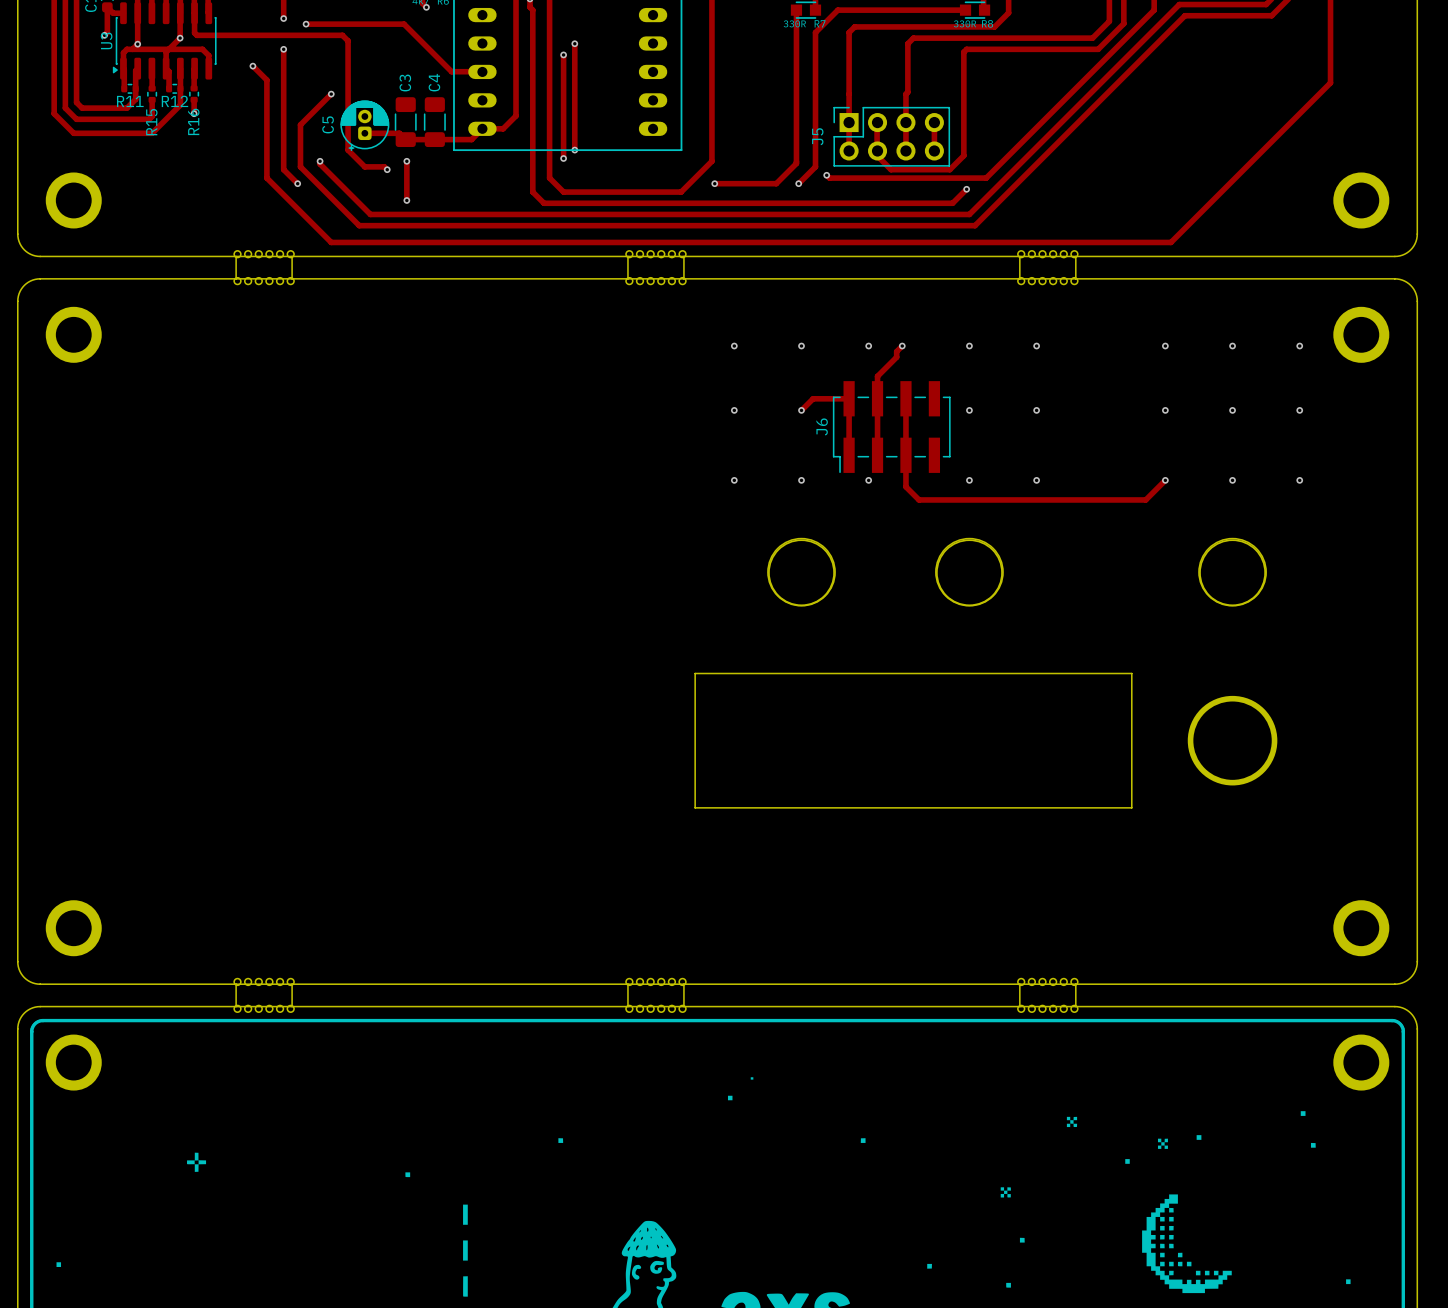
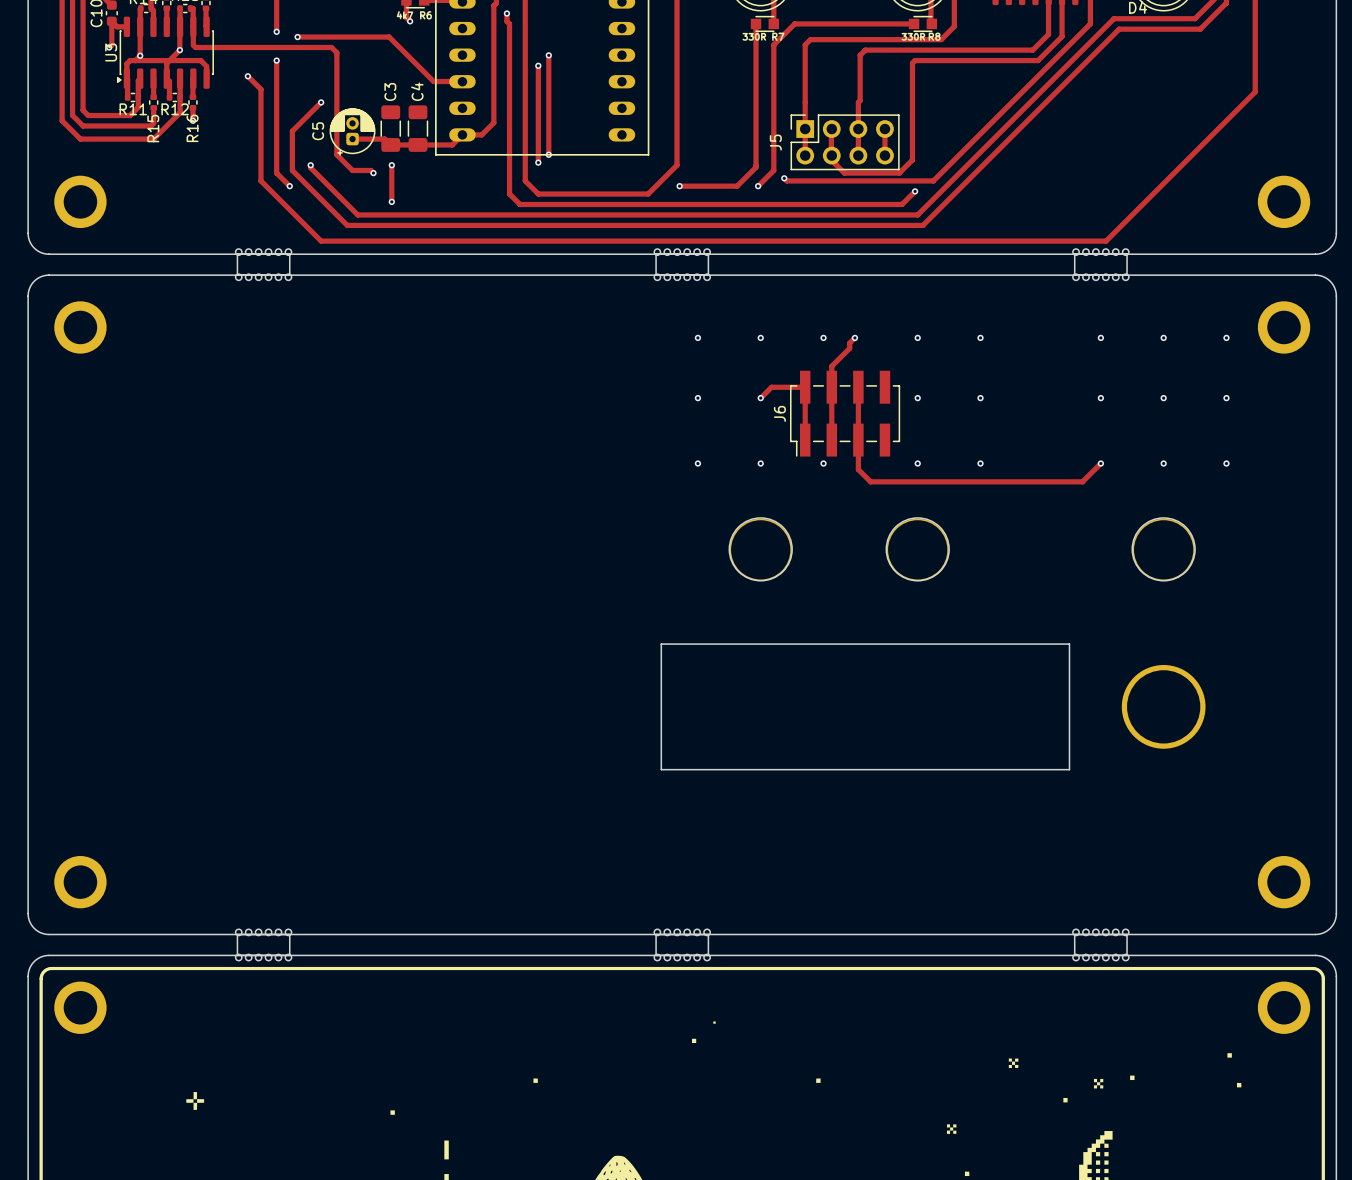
part footprint: [234, 250, 295, 285] -> [235, 248, 292, 281]
part: (655, 267) -> none
part: none -> (682, 264)
part: (1047, 267) -> none
part: none -> (1100, 264)
part footprint: [234, 978, 295, 1013] -> [235, 929, 292, 961]
part: (655, 995) -> none
part: none -> (682, 944)
part: (1047, 995) -> none
part: none -> (1100, 944)

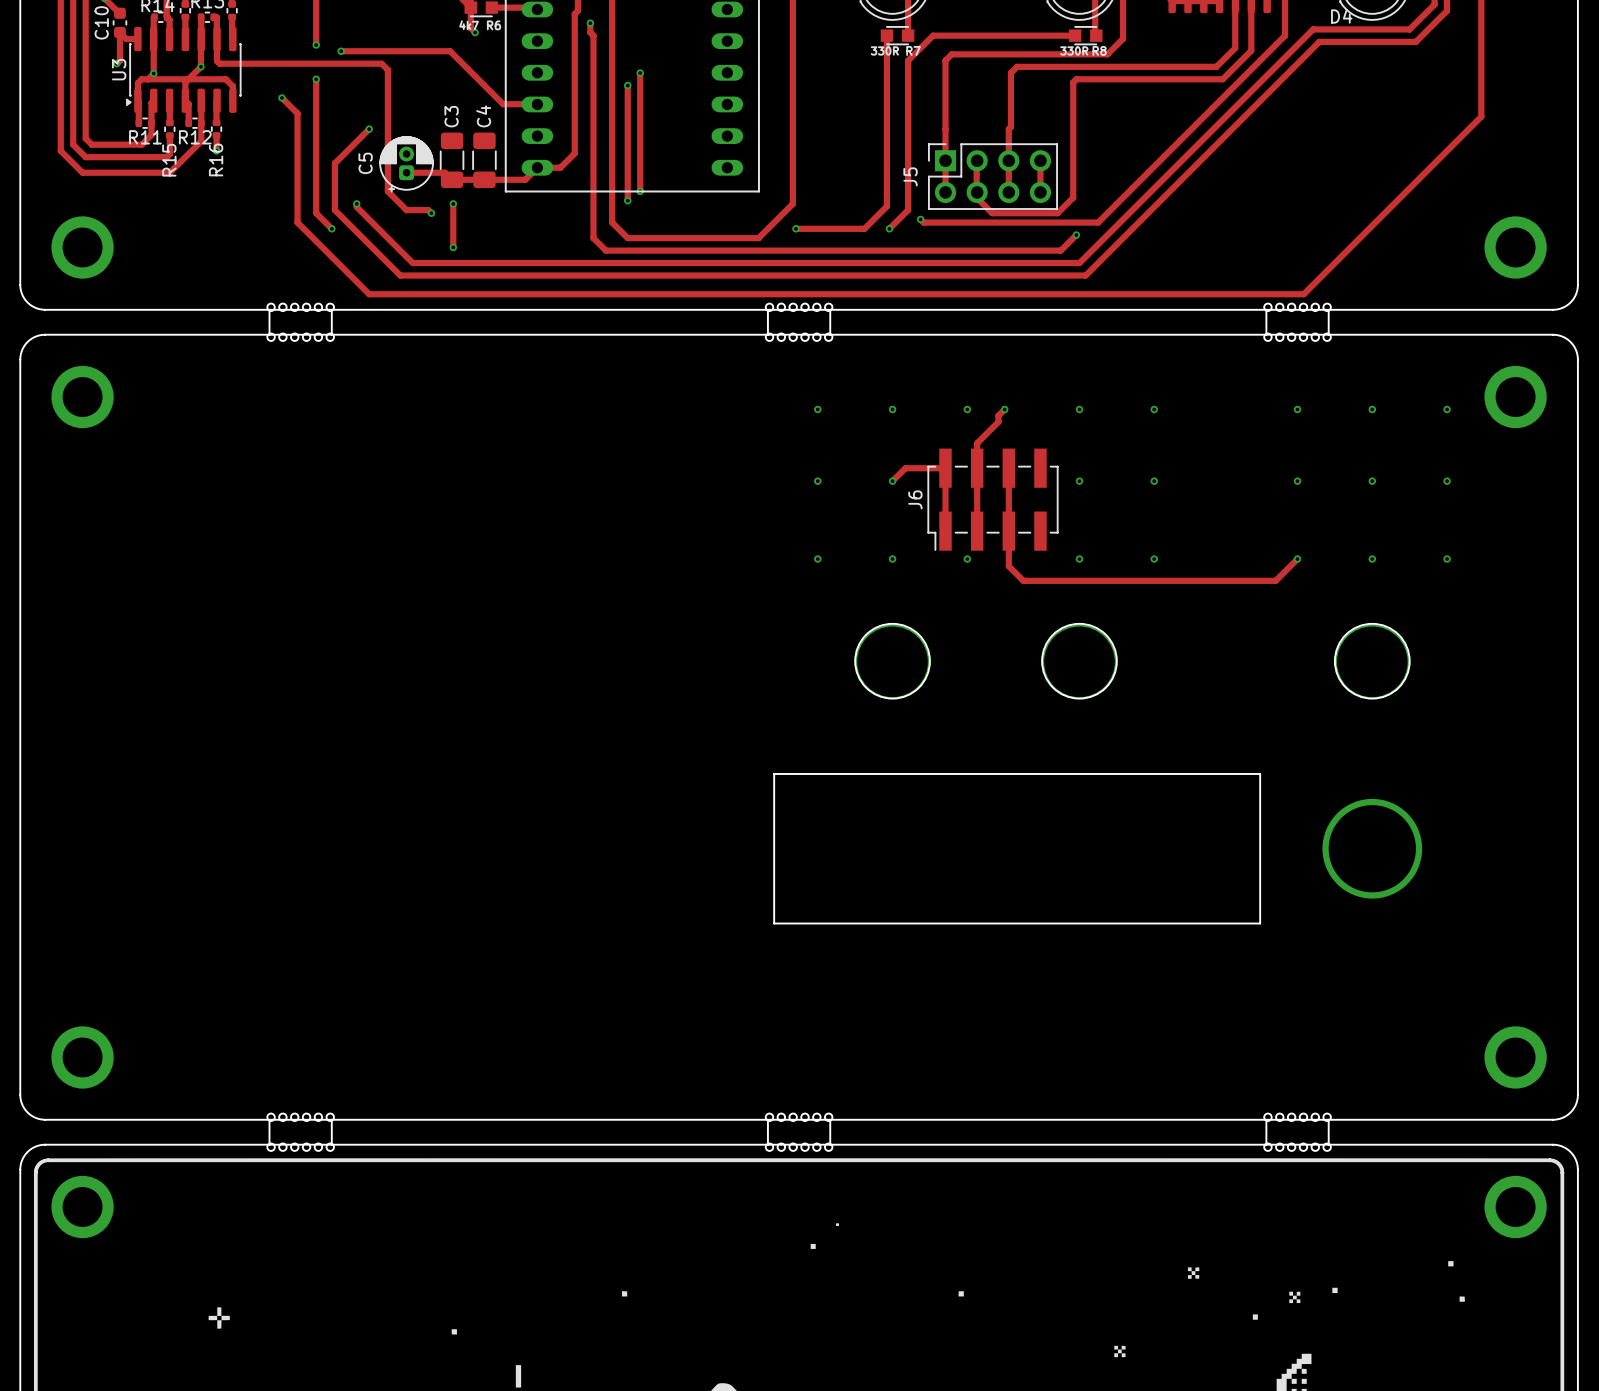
part footprint: [235, 248, 292, 281] -> [267, 303, 334, 341]
part footprint: [654, 248, 711, 281] -> [765, 303, 833, 341]
part footprint: [1072, 248, 1129, 281] -> [1264, 303, 1331, 341]
part footprint: [235, 929, 292, 961] -> [267, 1113, 334, 1151]
part footprint: [654, 929, 711, 961] -> [765, 1113, 833, 1151]
part footprint: [1072, 929, 1129, 961] -> [1264, 1113, 1331, 1151]

